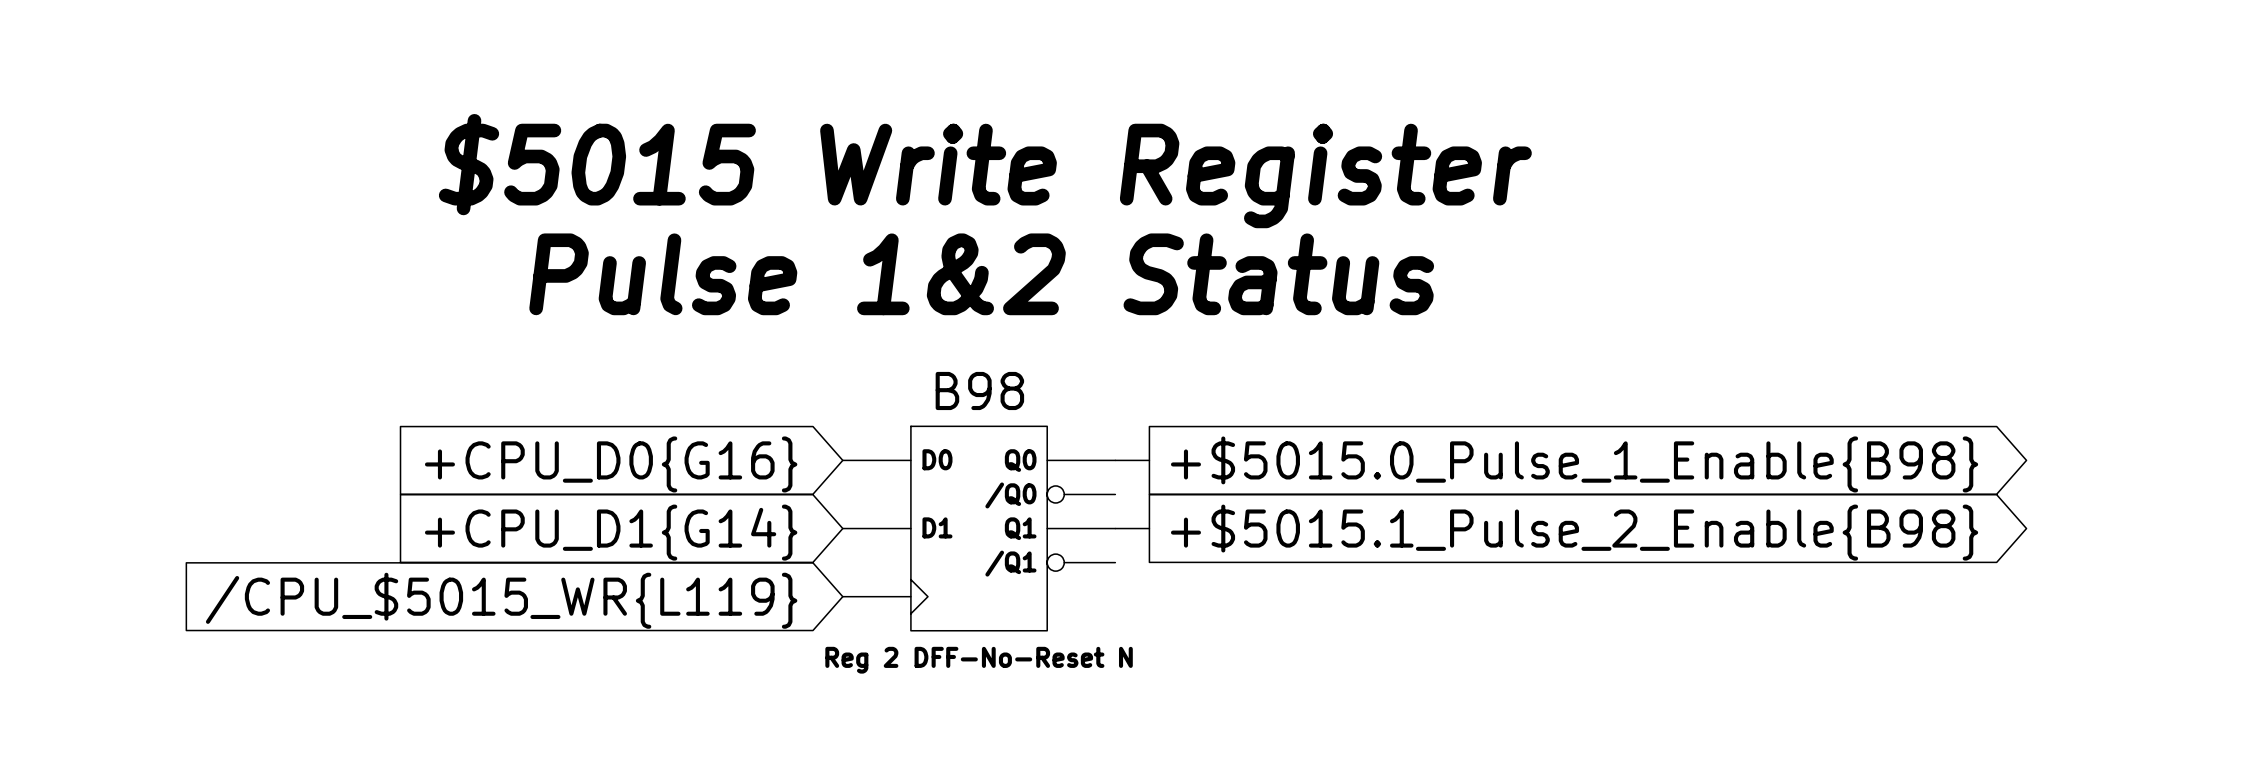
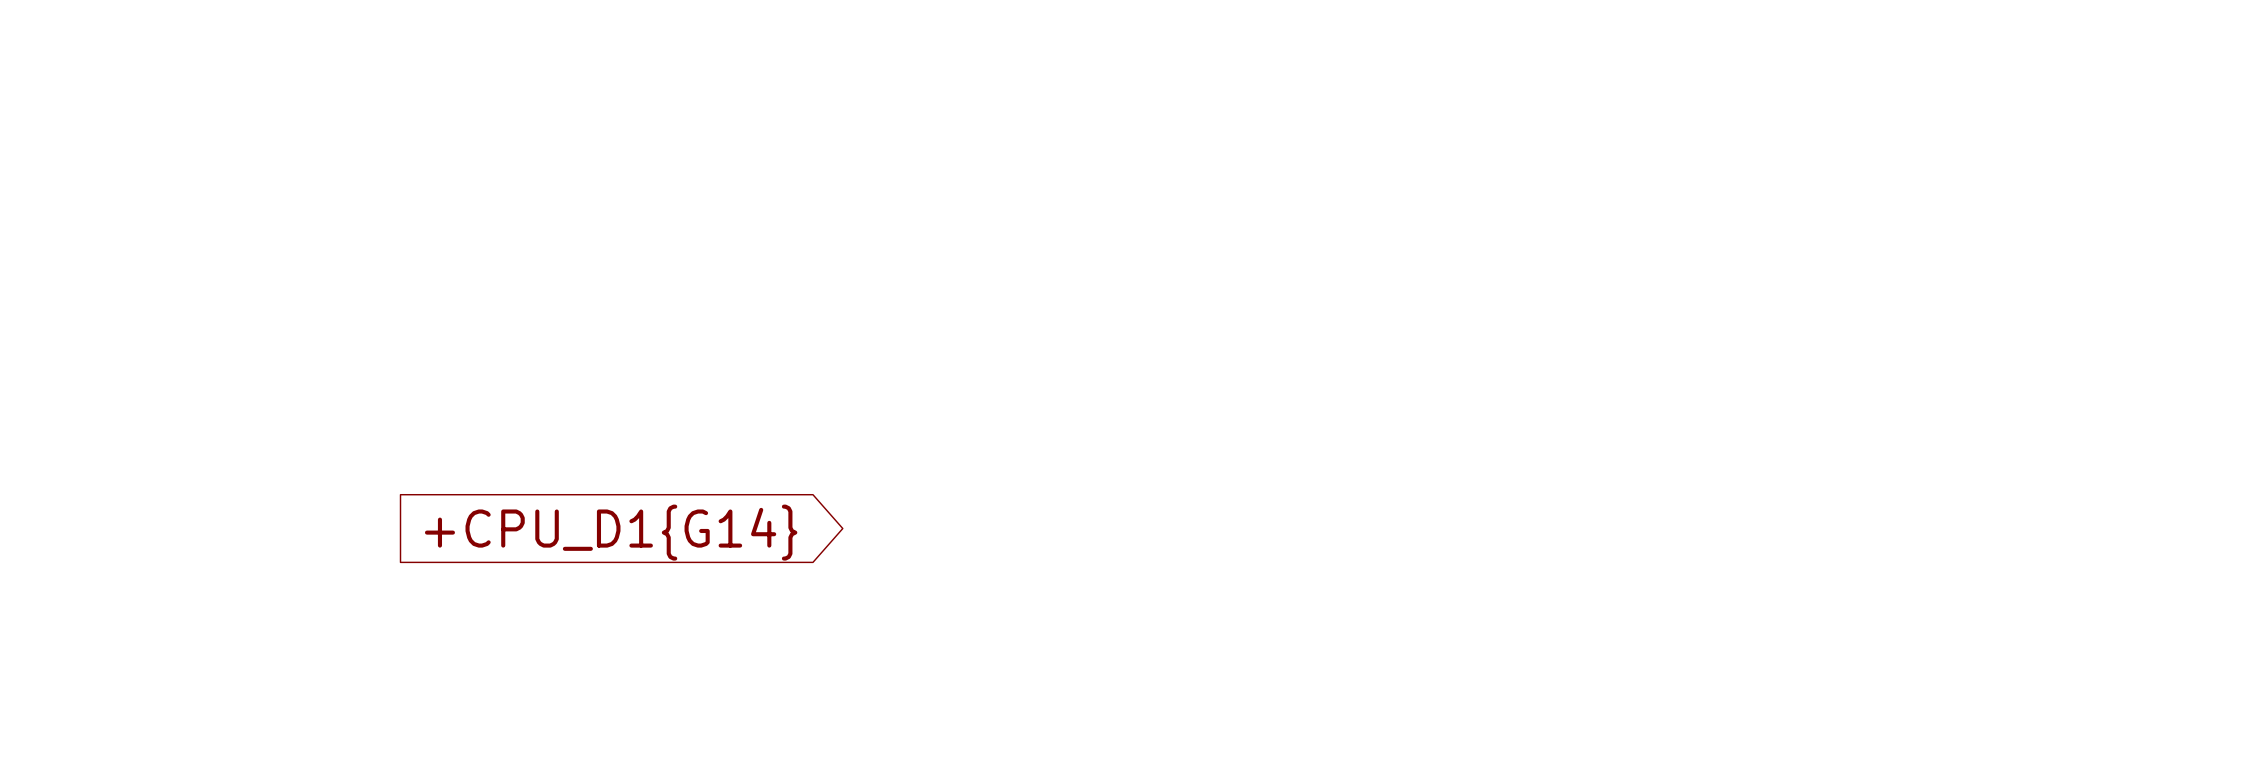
text: $5015 Write Register (985, 171) -> none
text: Pulse 1&2 Status (981, 274) -> none
wire: (1115, 460) (1149, 460) -> none
global label: +CPU_D0{G16} (611, 464) -> none
global label: +$5015.0_Pulse_1_Enable{B98} (1574, 464) -> none
B98: Reg 2 DFF-No-Reset N (979, 528) -> none
wire: (1115, 528) (1149, 528) -> none
global label: +$5015.1_Pulse_2_Enable{B98} (1574, 532) -> none
global label: /CPU_$5015_WR{L119} (501, 600) -> none

